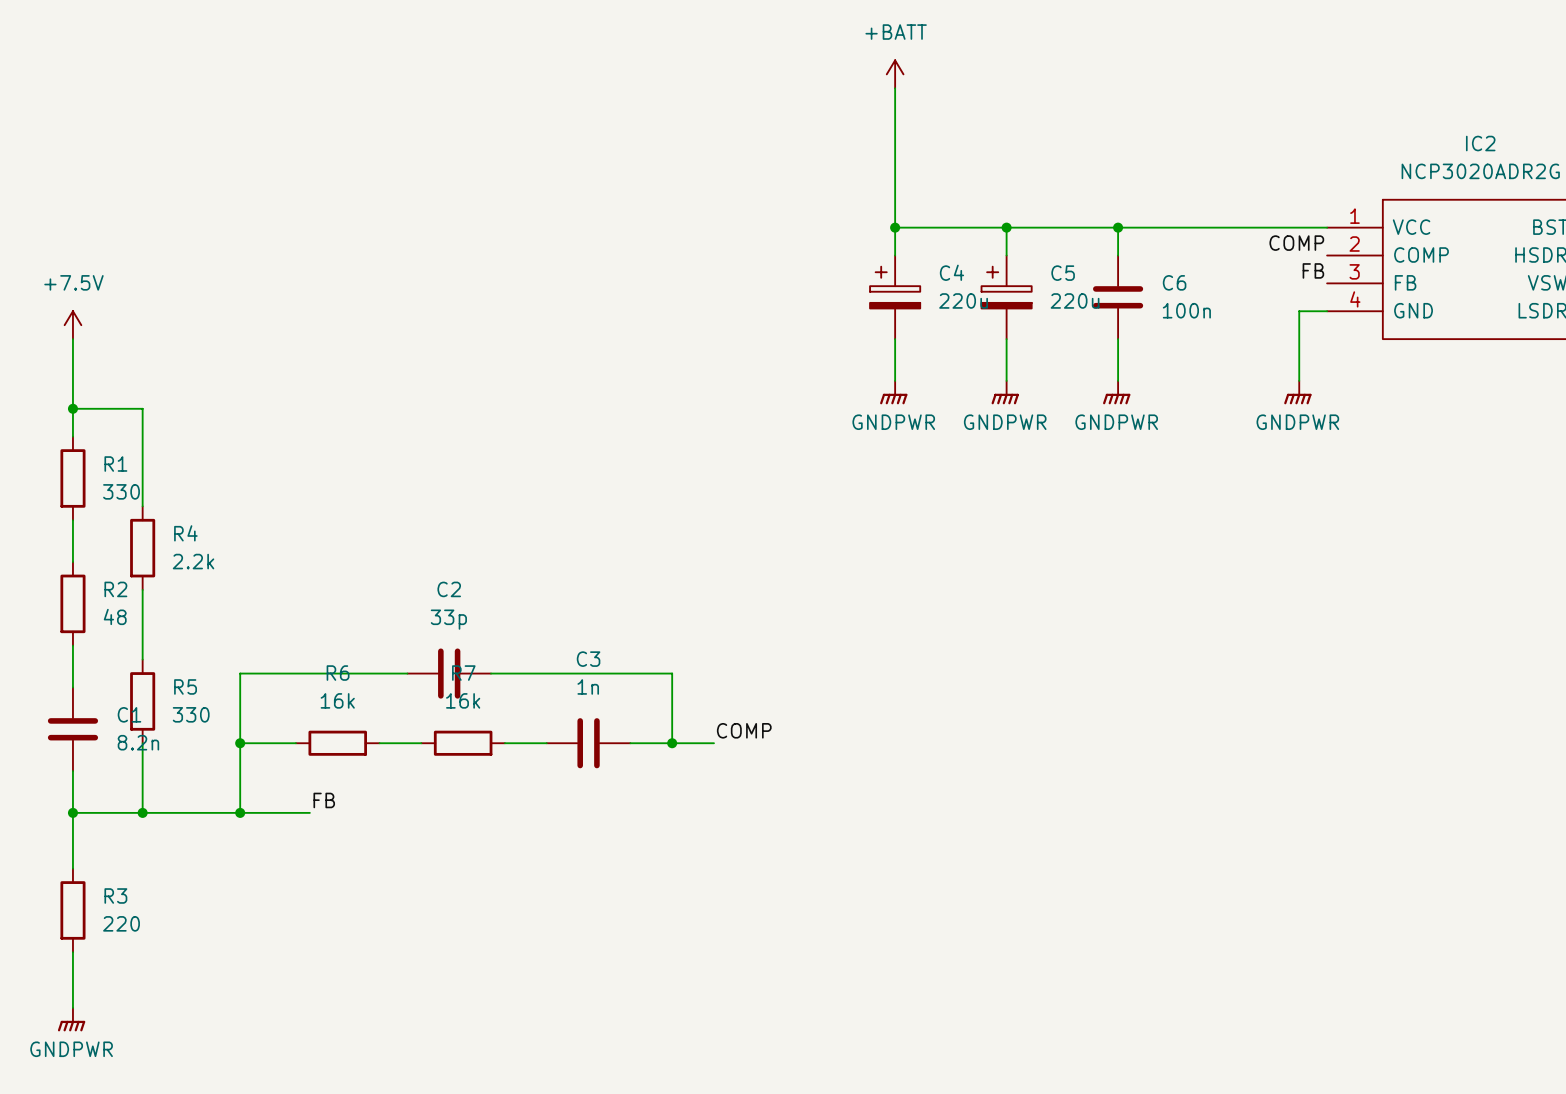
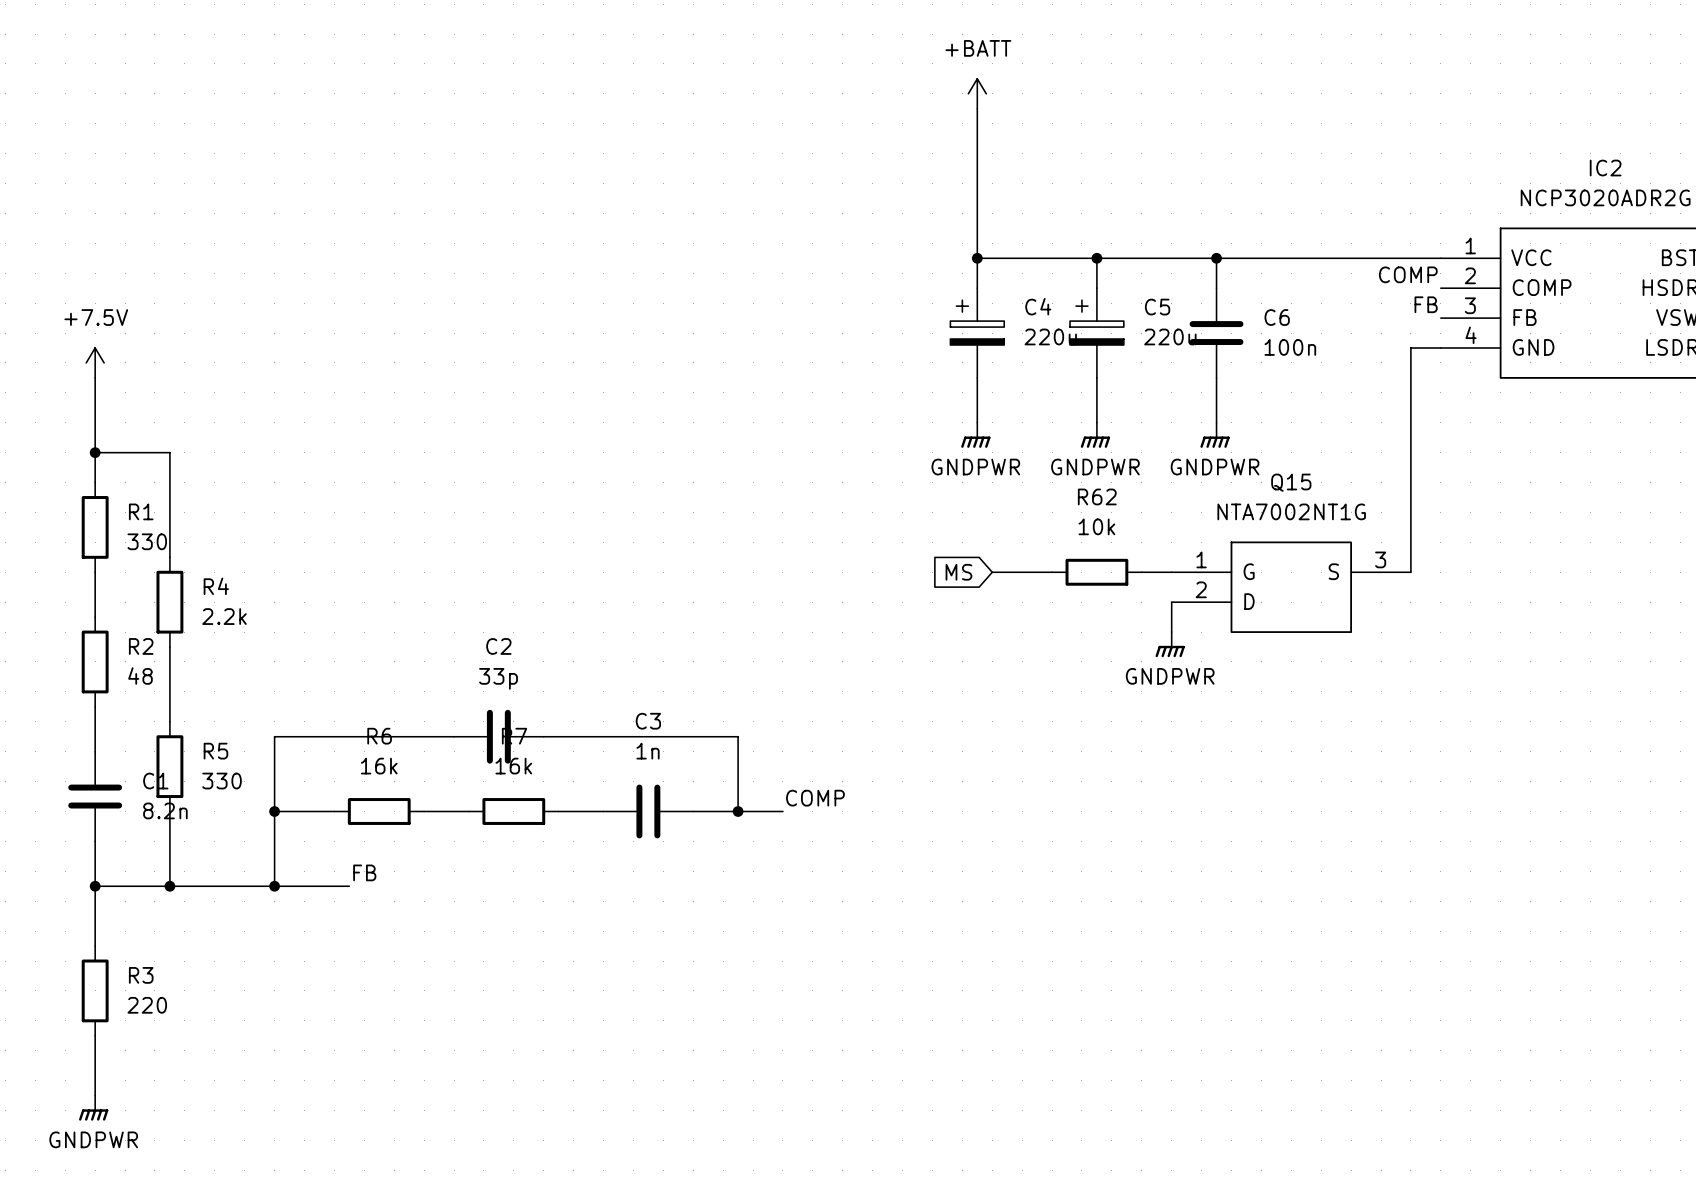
wire: none -> (1410, 422) (1410, 572)
power symbol: GNDPWR (1297, 392) -> none
global label: none -> MS (958, 572)
wire: none -> (992, 572) (1052, 572)
R62: none -> 10k (1096, 572)
wire: none -> (1141, 572) (1171, 572)
Q15: none -> NTA7002NT1G (1291, 587)
wire: none -> (1171, 602) (1171, 632)
power symbol: none -> GNDPWR (1170, 644)

